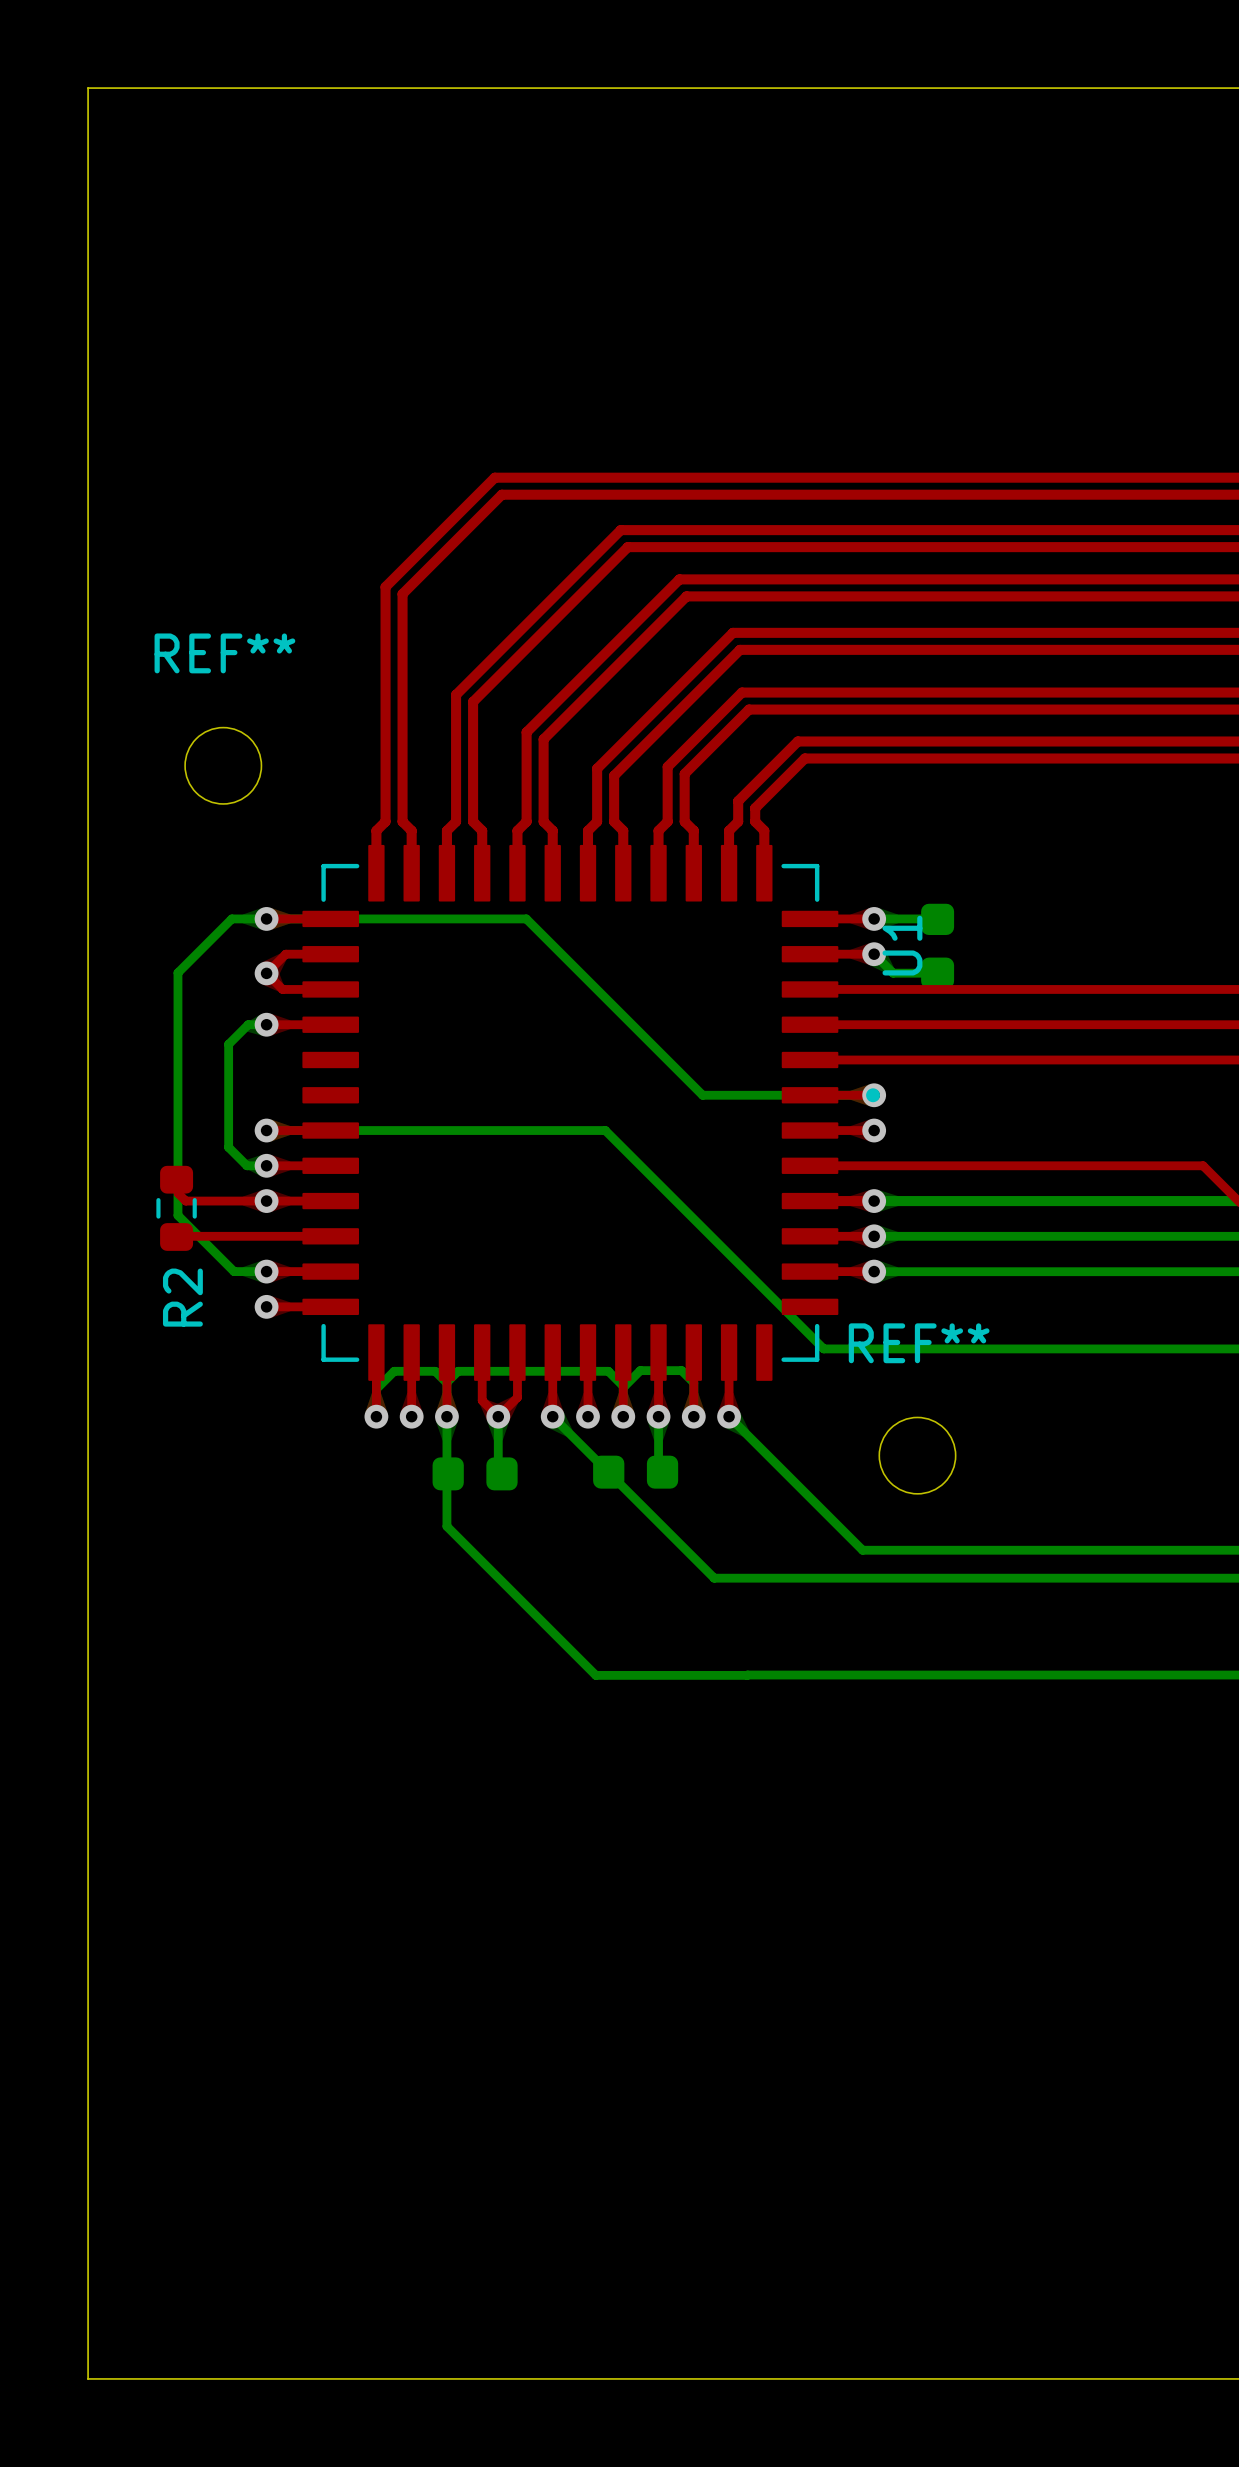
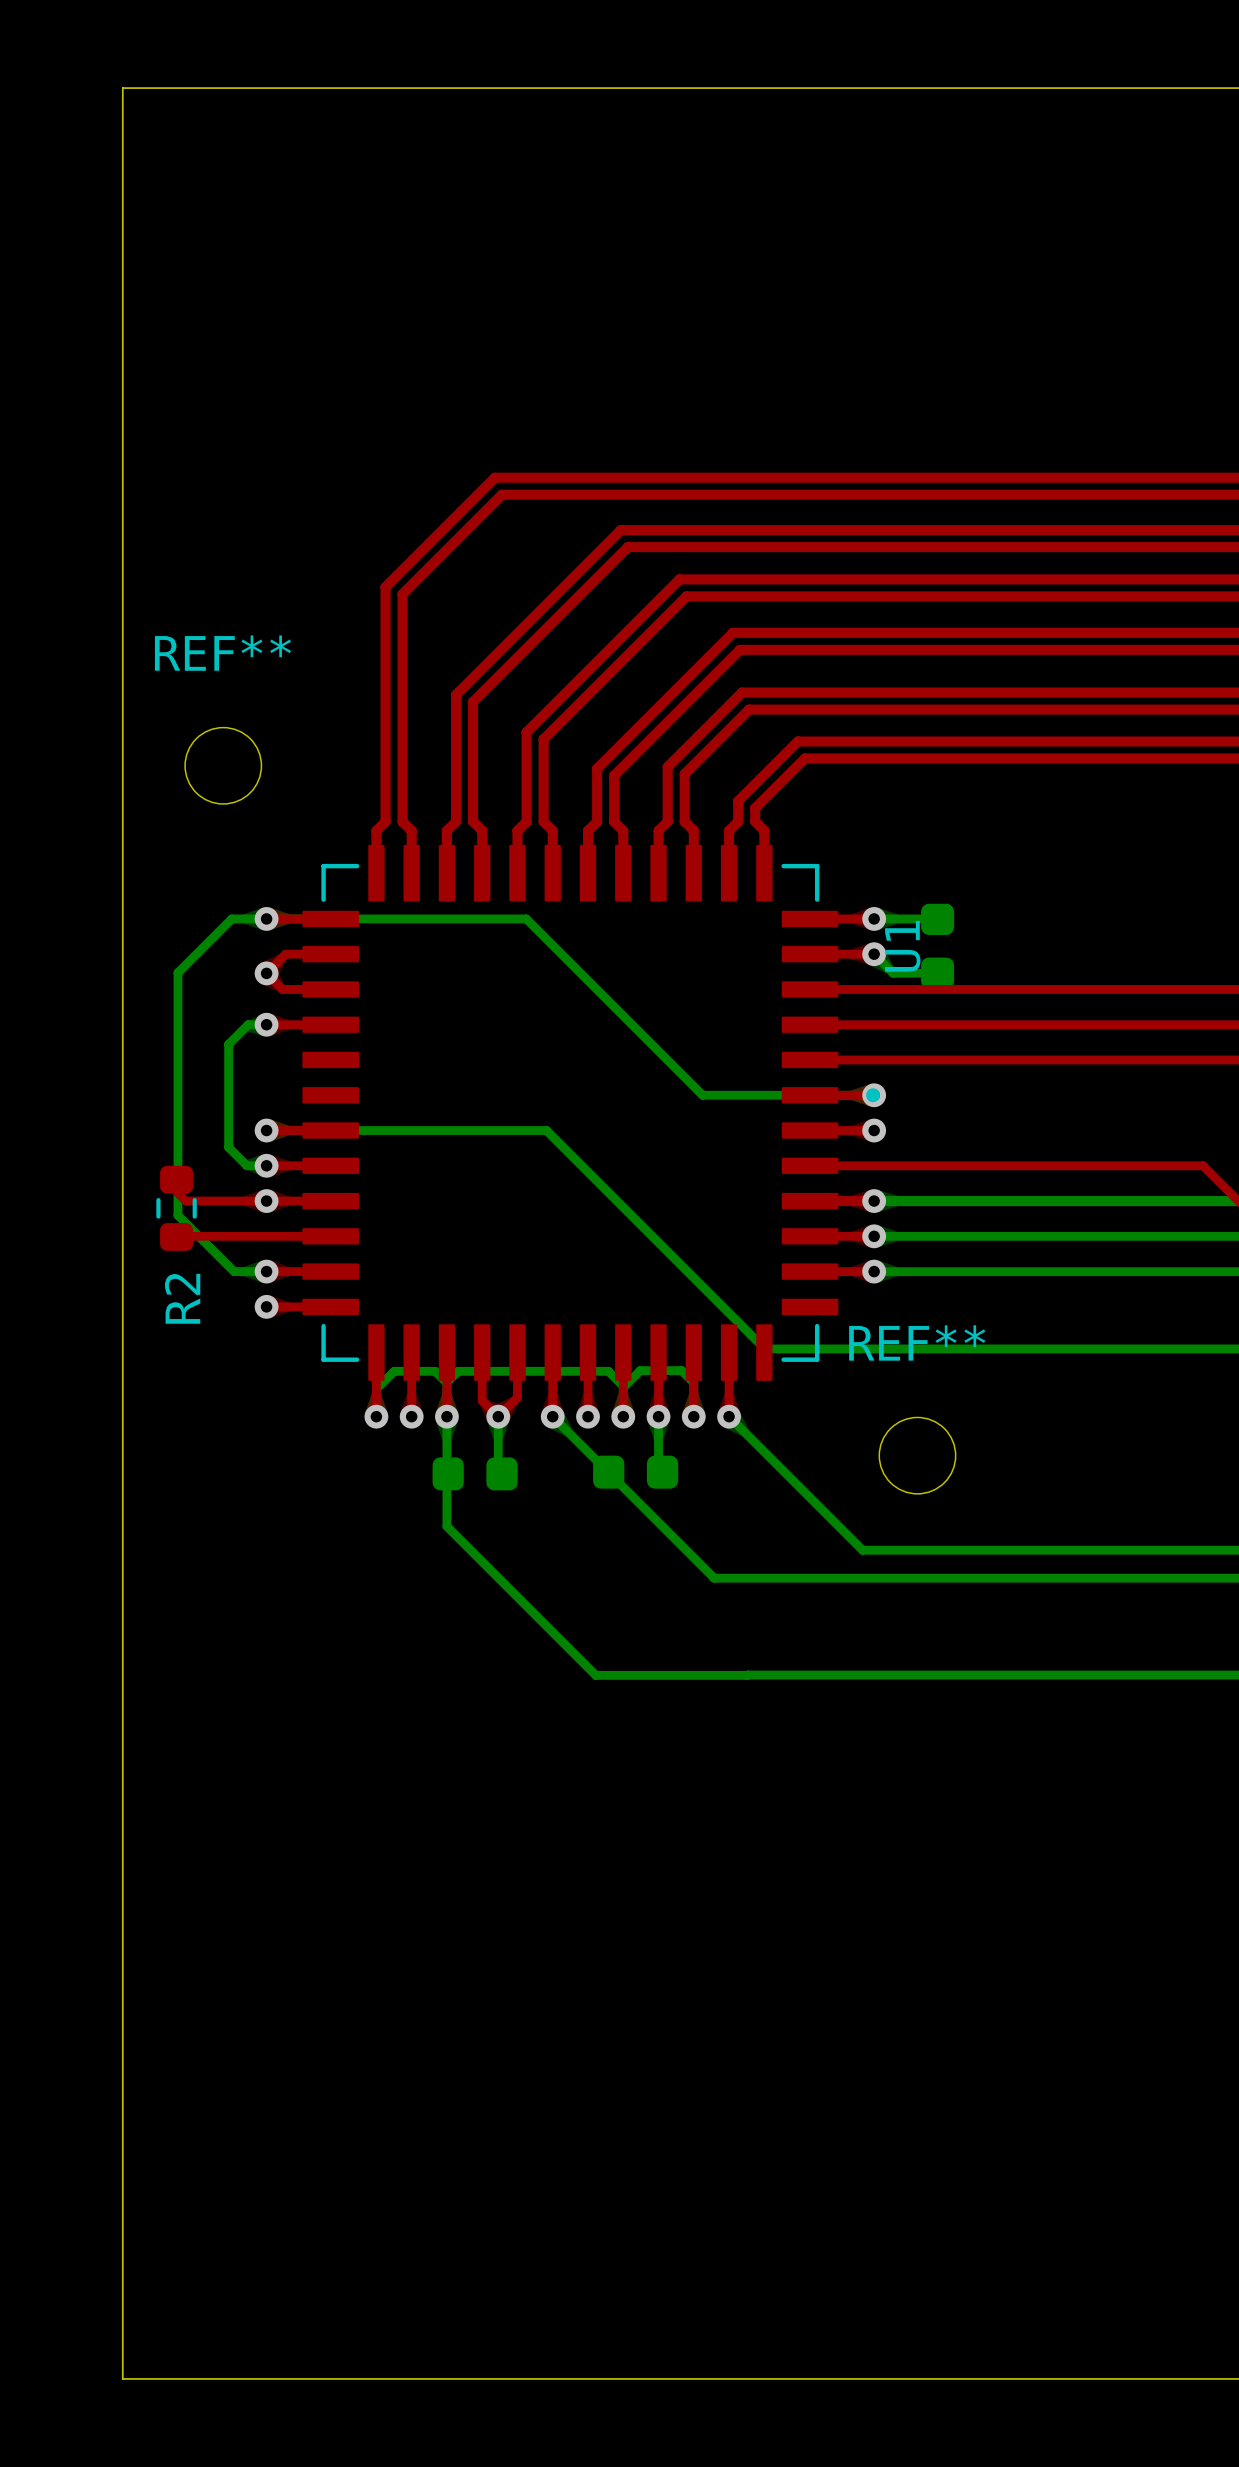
board edge: (122, 88) (88, 88) (88, 2378) (122, 2378) -> (122, 88) (122, 2378)
bottom track: (546, 1130) (605, 1130) (823, 1348) -> (546, 1130) (764, 1348) (823, 1348)

